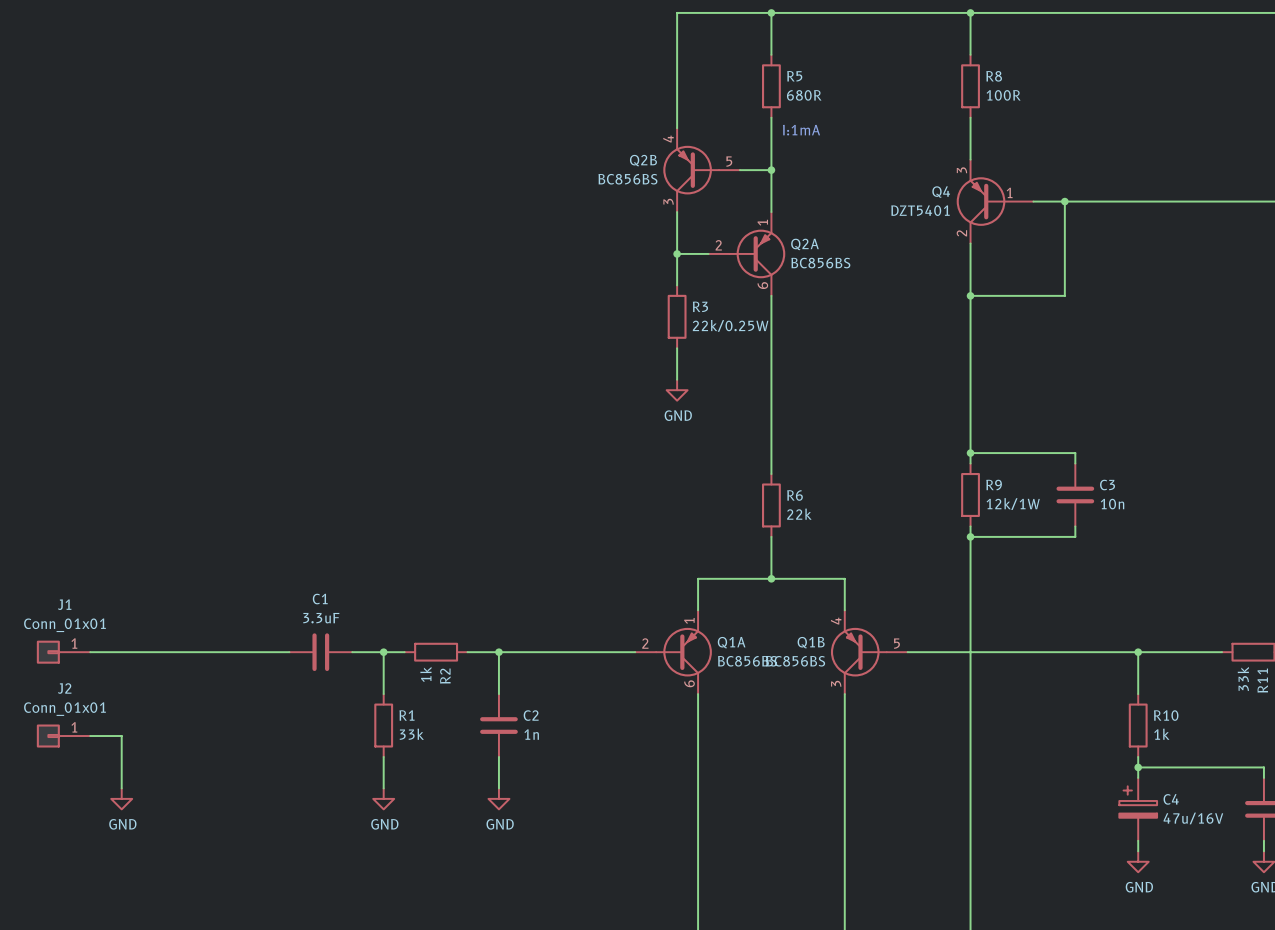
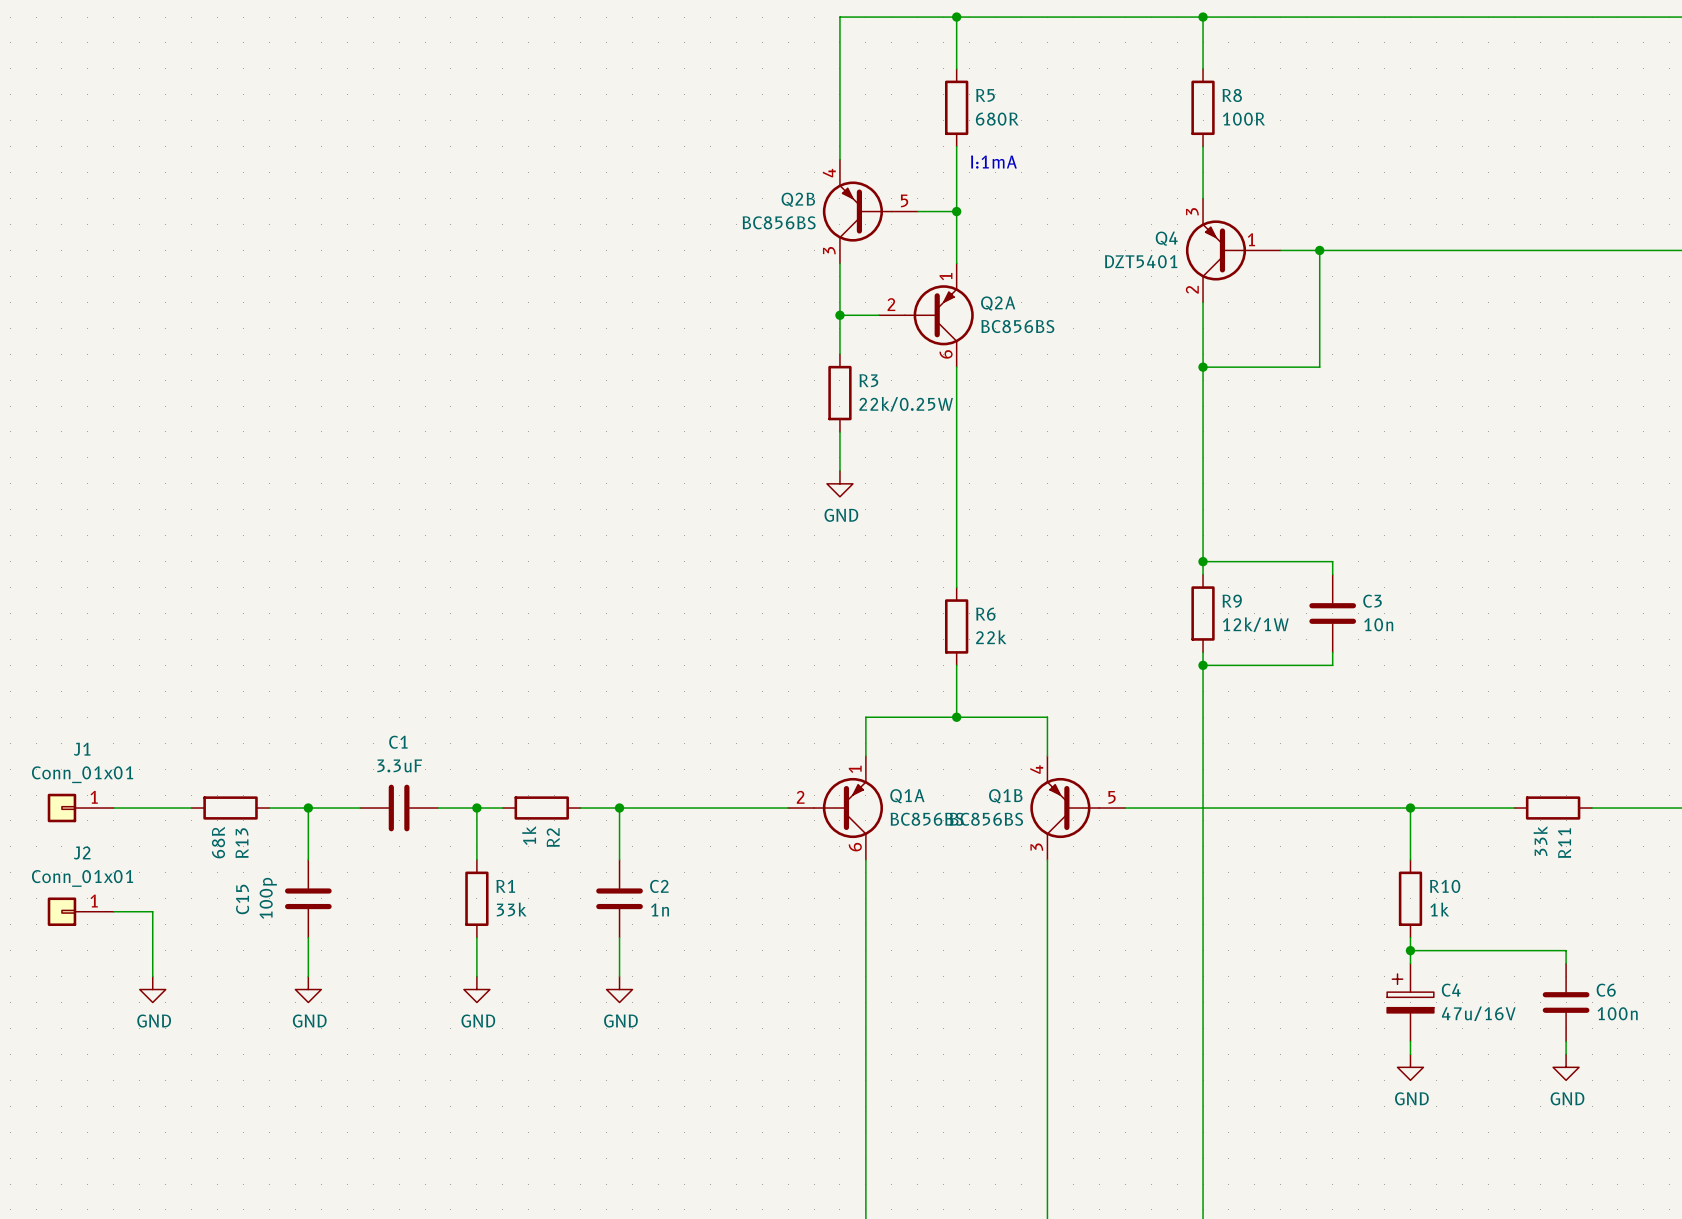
wire: (153, 652) (216, 652) -> none
R13: none -> 68R (230, 808)
wire: none -> (308, 808) (308, 859)
junction: none -> (308, 808)
C15: none -> 100p (308, 898)
wire: none -> (308, 937) (308, 976)
power symbol: none -> GND (308, 989)

